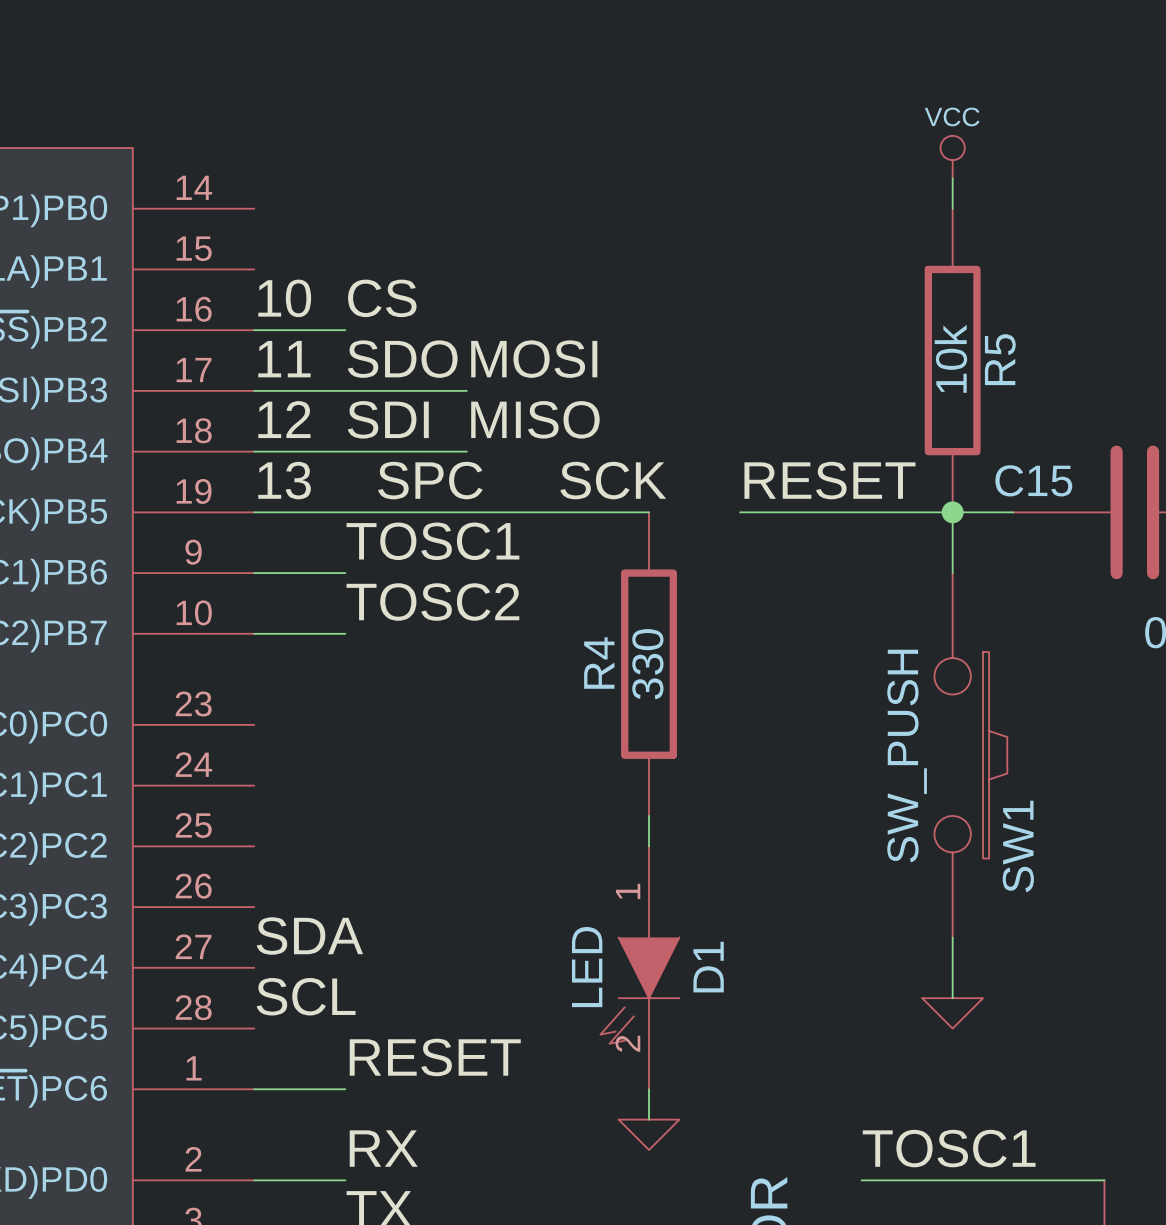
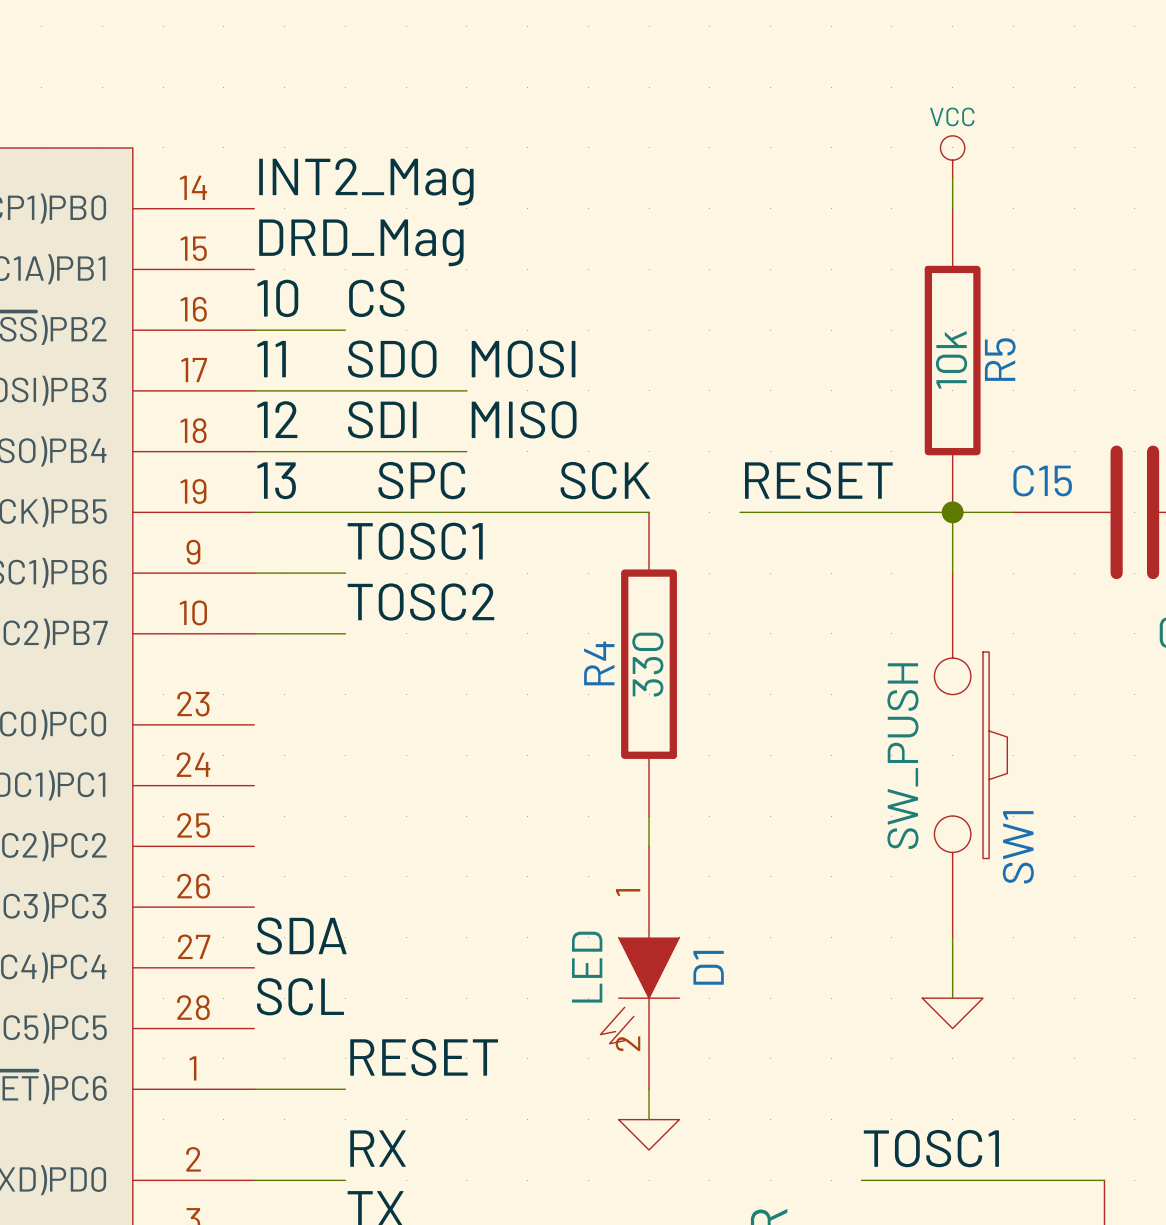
label: none -> INT2_Mag (366, 181)
label: none -> DRD_Mag (361, 242)

